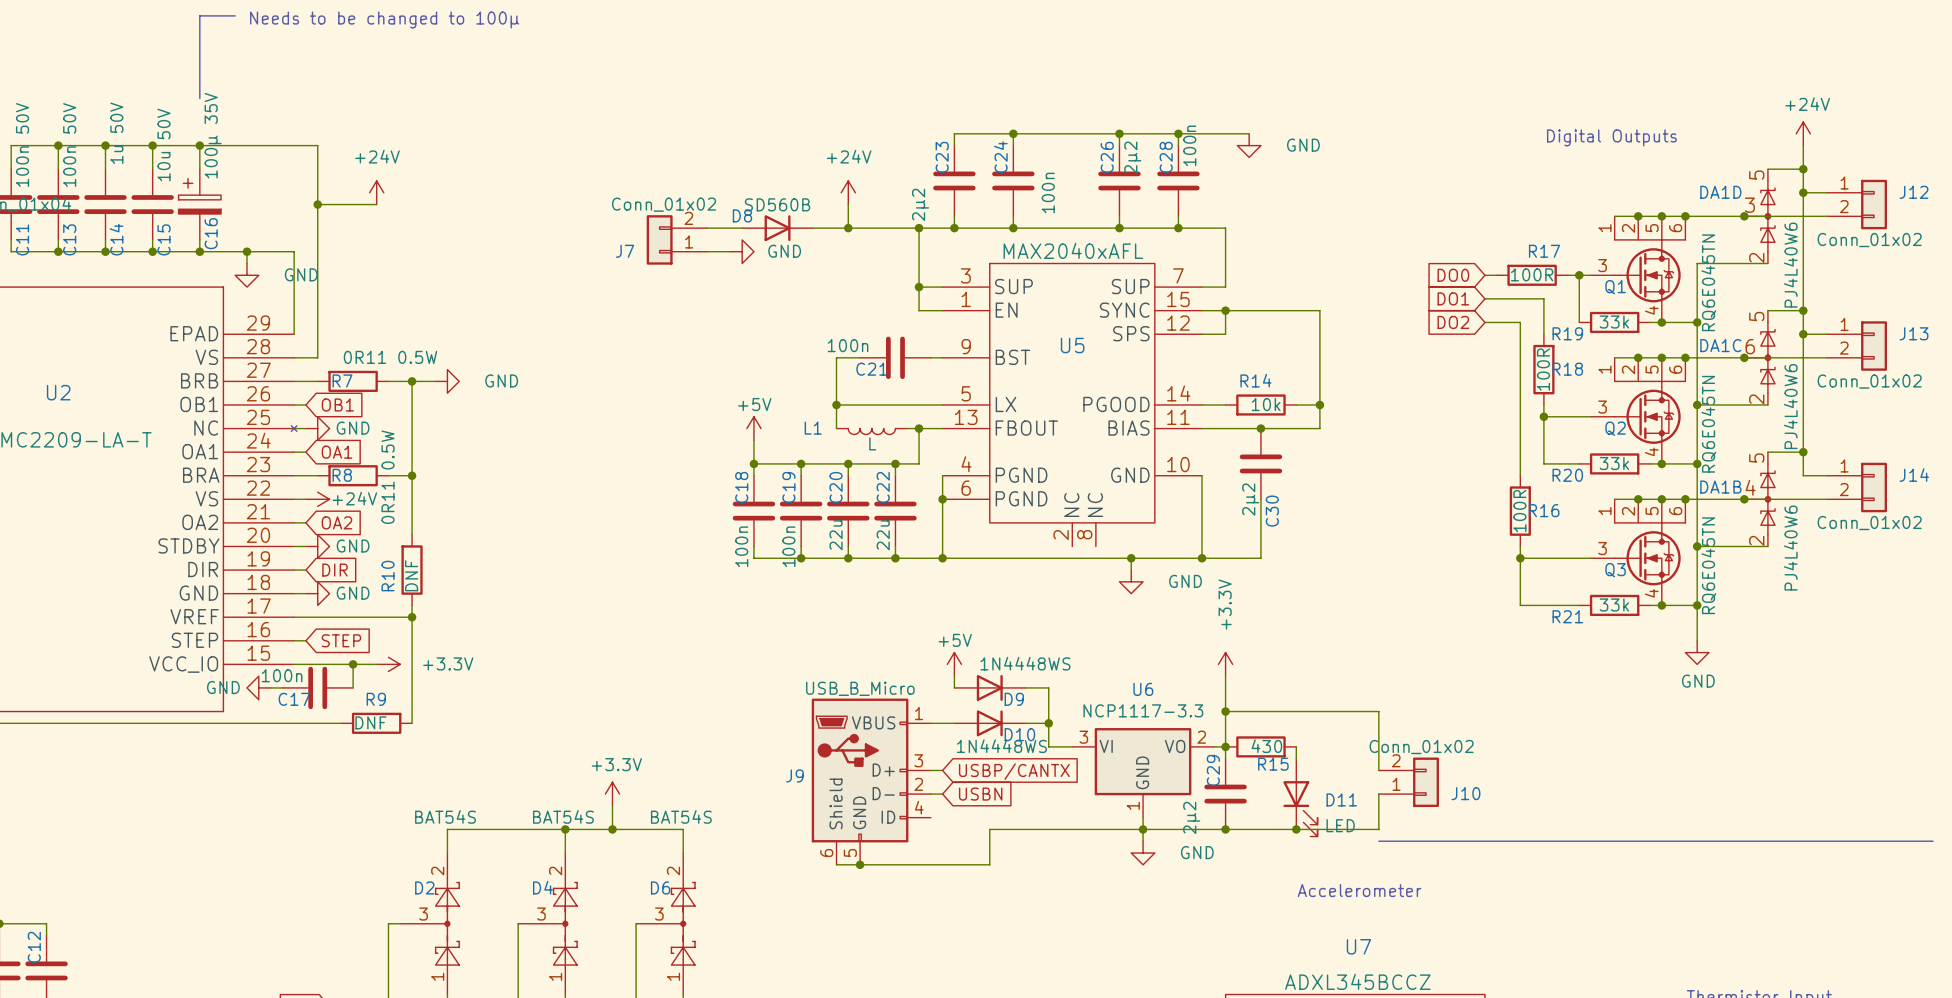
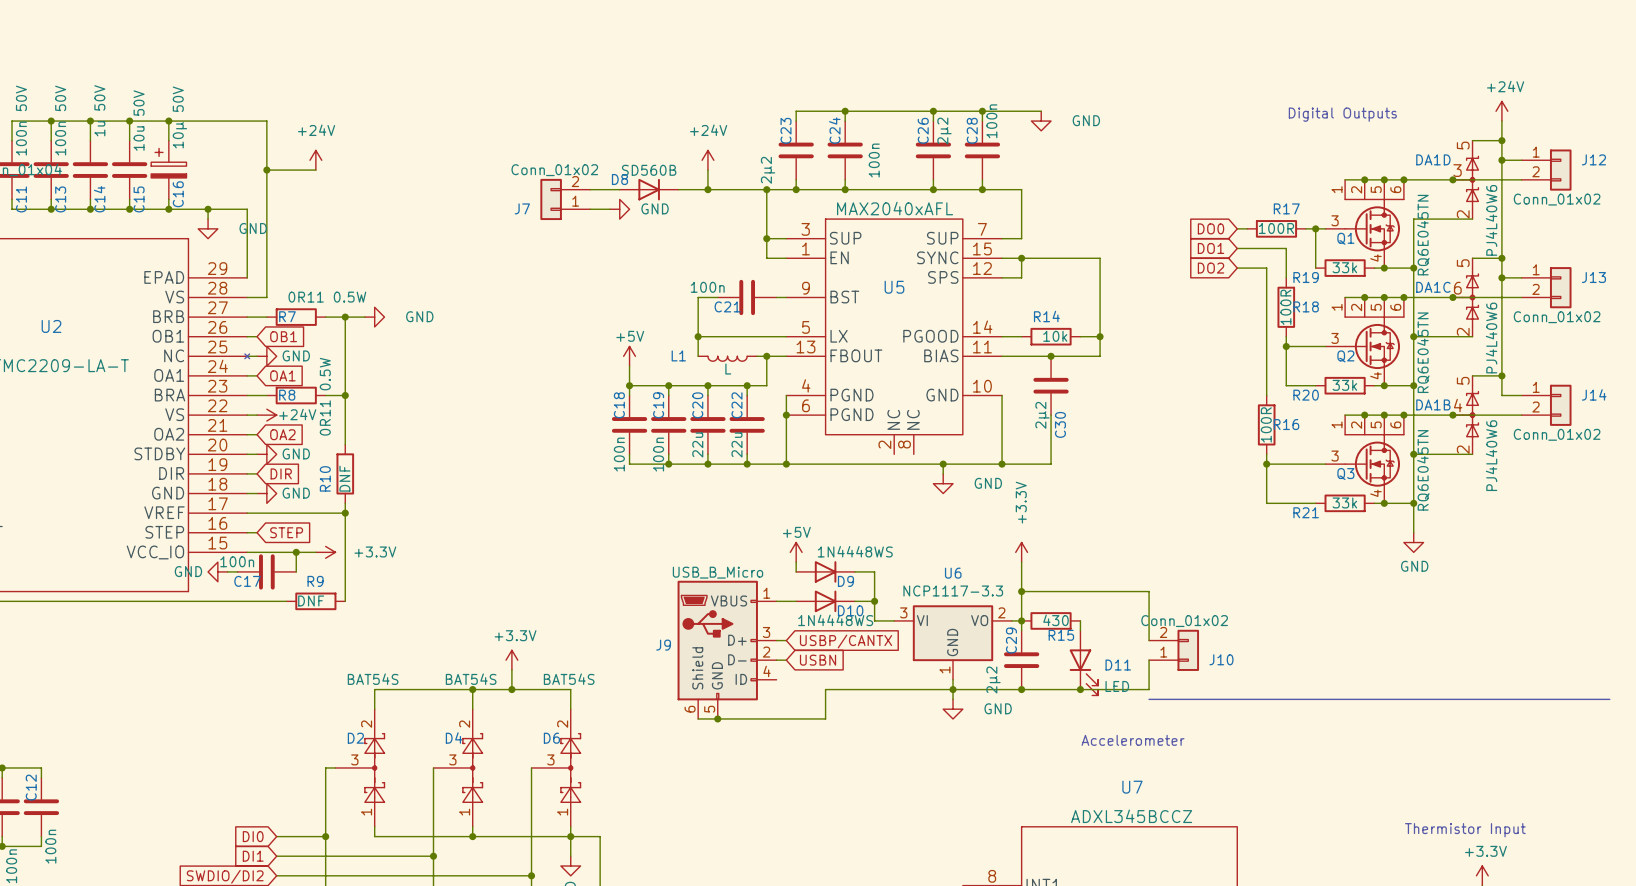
line: (235, 15) (199, 15) (199, 98) -> none
text: Needs to be changed to 100µ (384, 20) -> none
C16 value: 100µ 35V (213, 135) -> 10µ 50V (179, 117)

